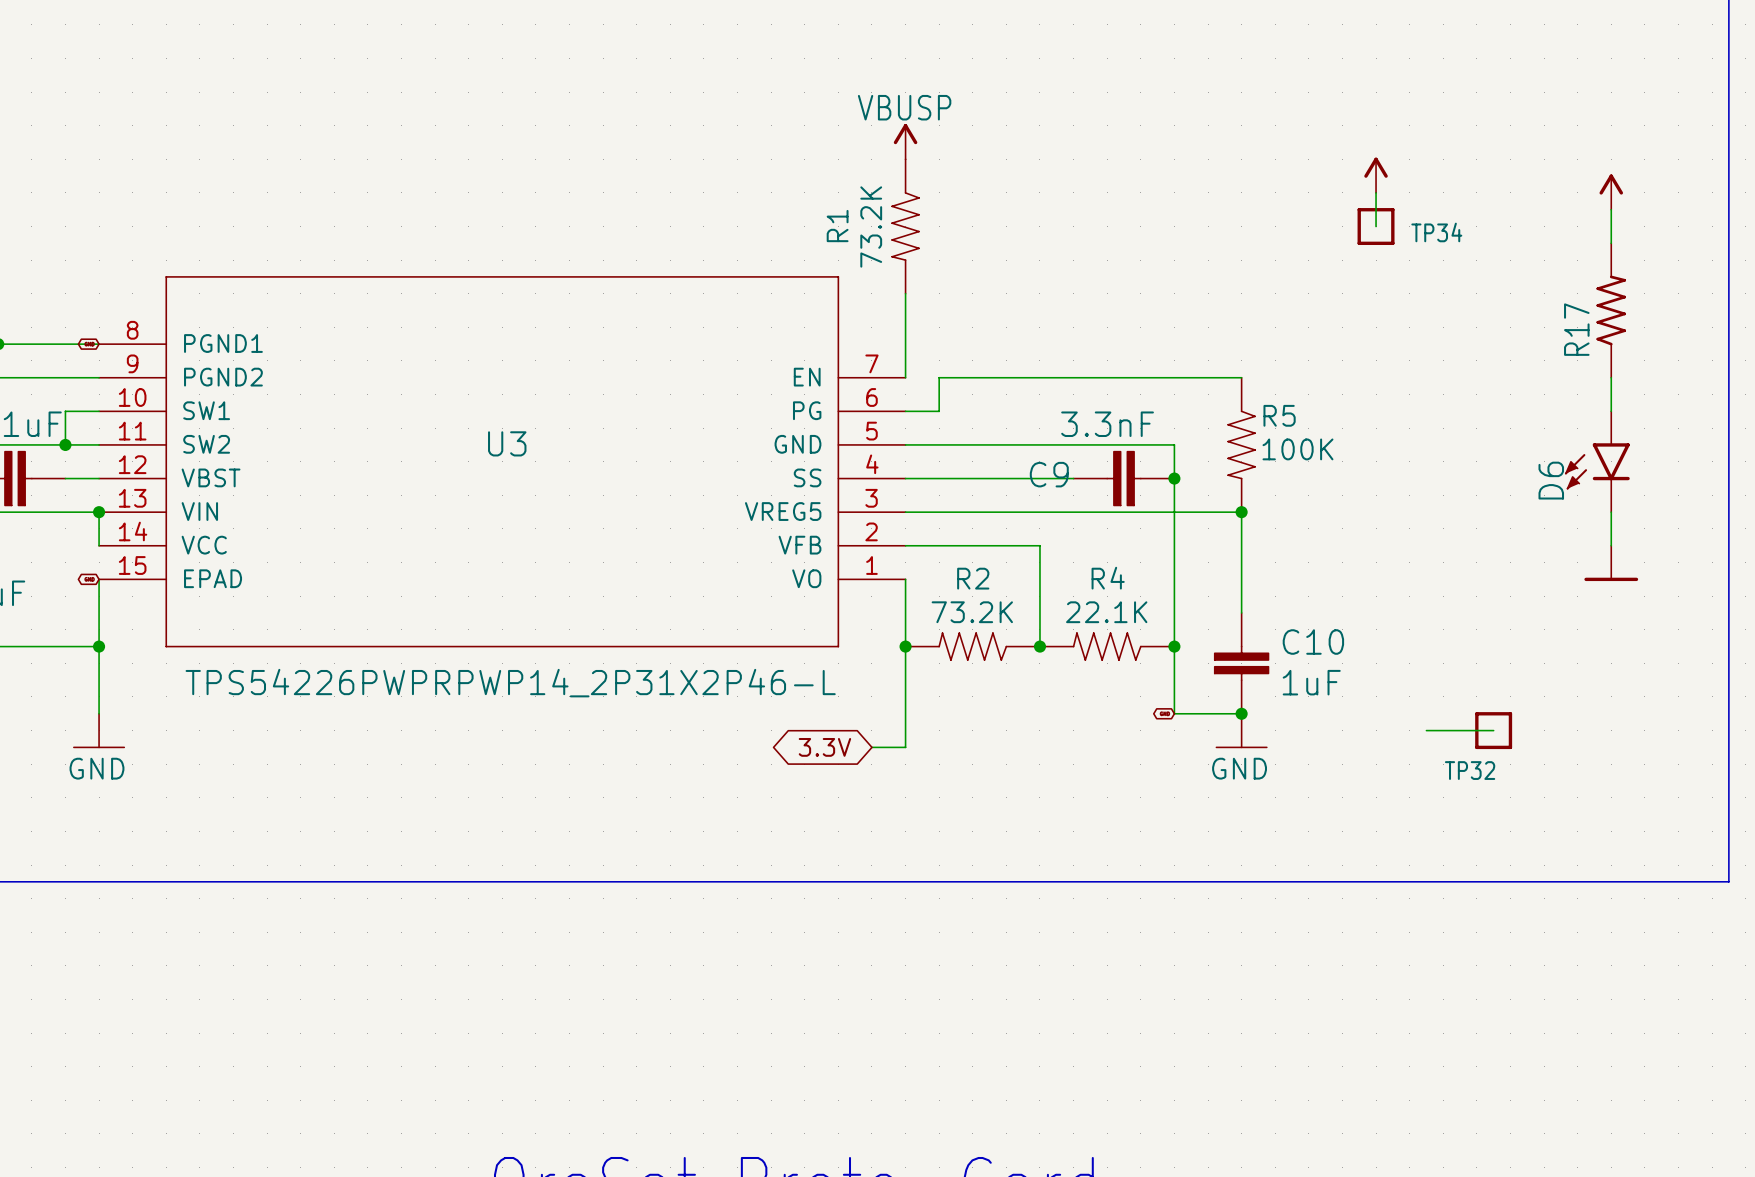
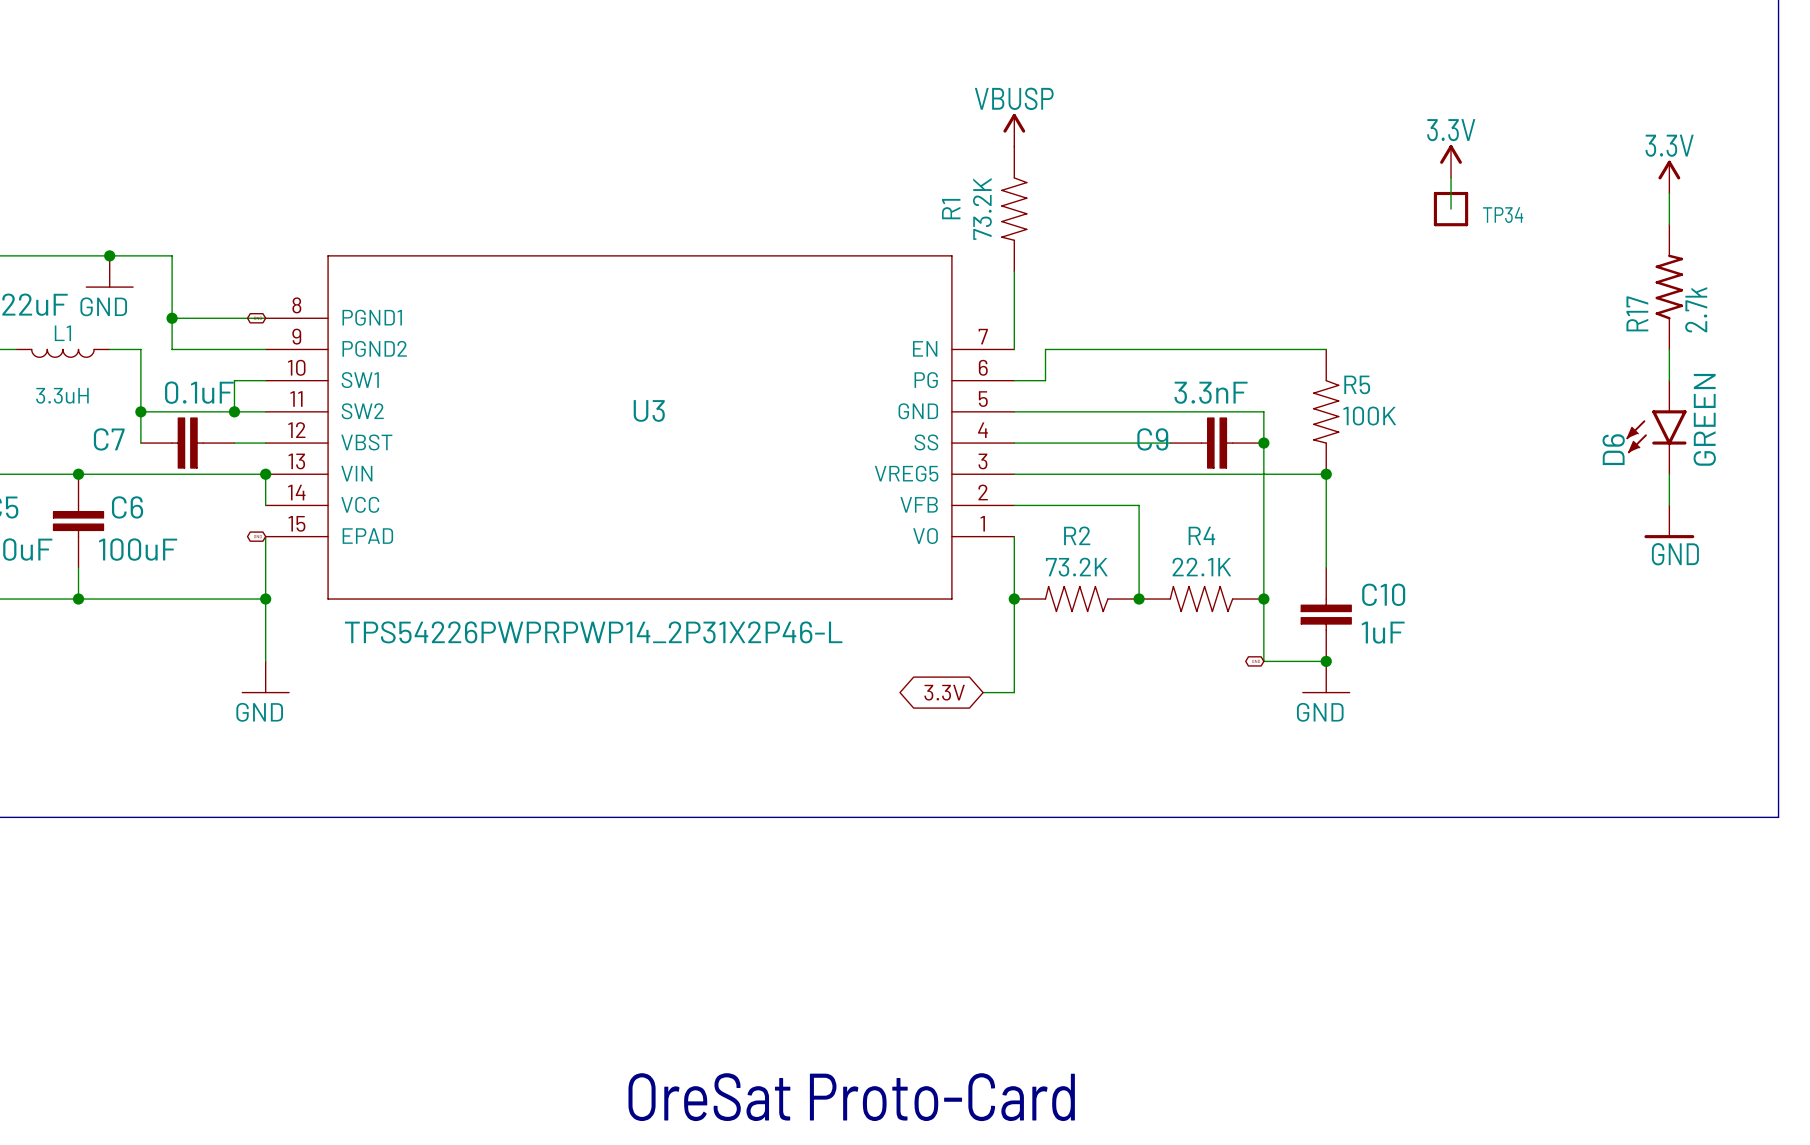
power symbol text: none -> 3.3V (1451, 130)
power symbol text: none -> 3.3V (1669, 145)
R17 value: none -> 2.7k (1696, 309)
D6 value: none -> GREEN (1704, 419)
power symbol text: none -> GND (1675, 554)
wire: (1426, 730) (1493, 730) -> none
TP32: (1493, 730) -> none

